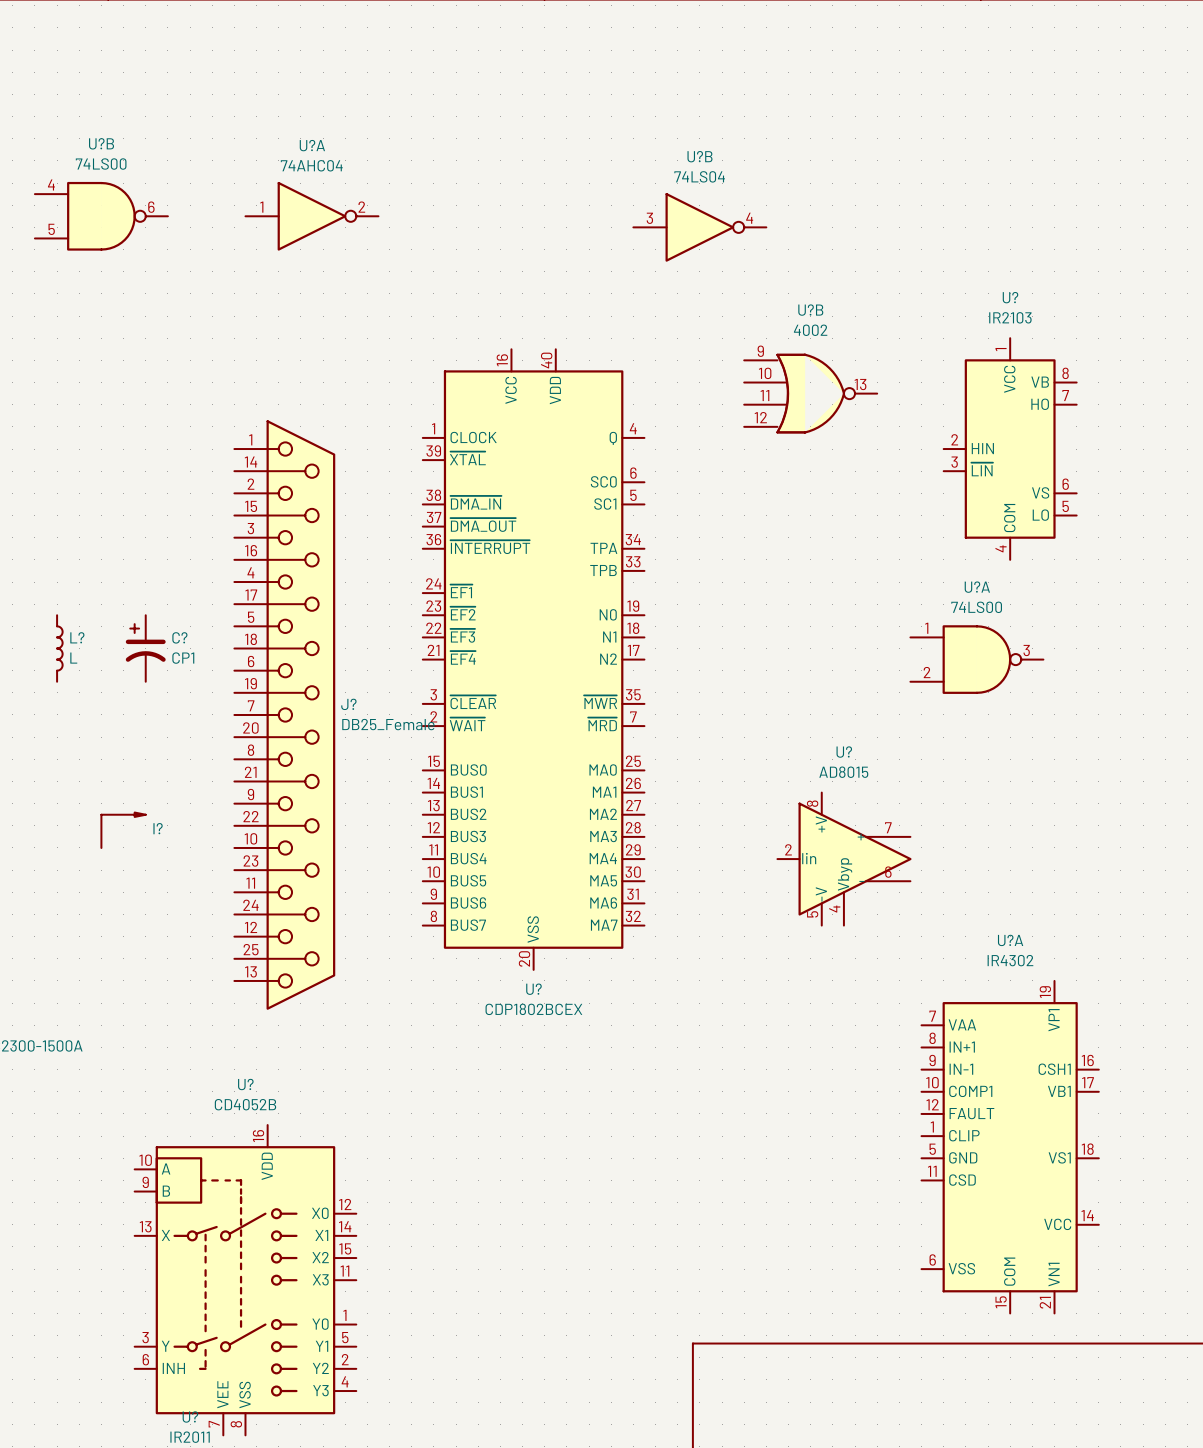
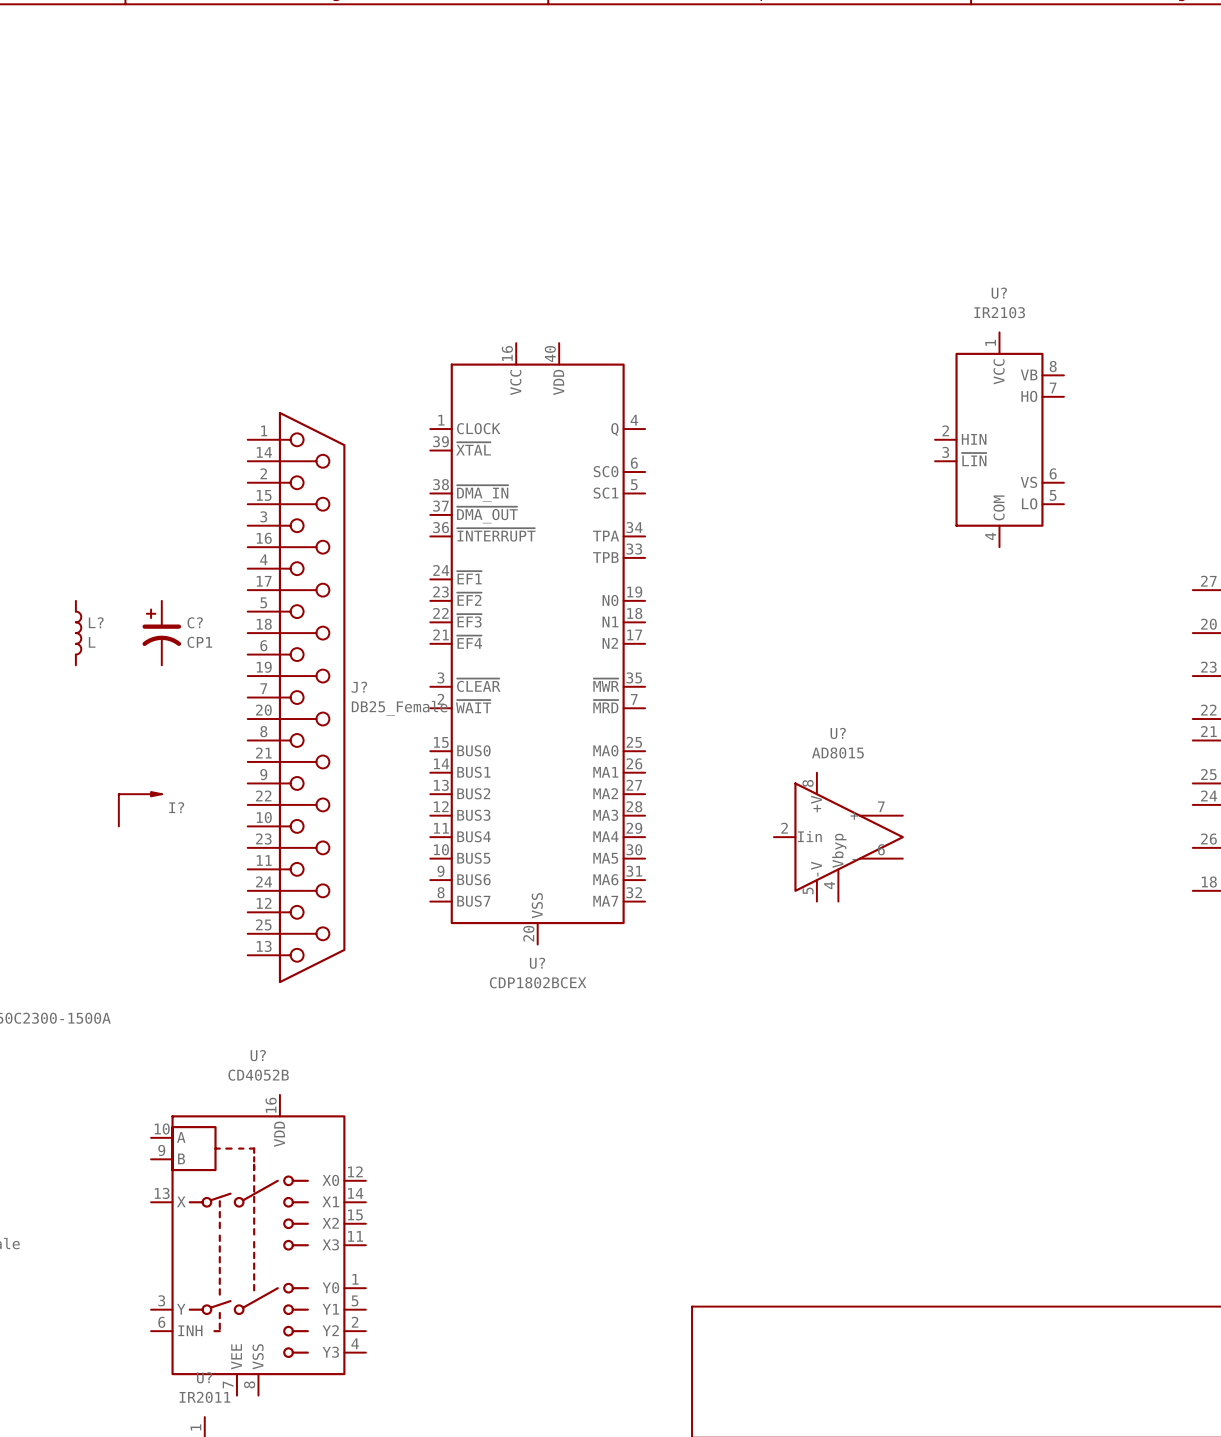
U?B: 74LS00 (101, 216) -> none
U?A: 74AHC04 (311, 216) -> none
U?B: 74LS04 (699, 227) -> none
U?B: 4002 (810, 393) -> none
U?A: 74LS00 (976, 659) -> none
U?A: IR4302 (1010, 1147) -> none

